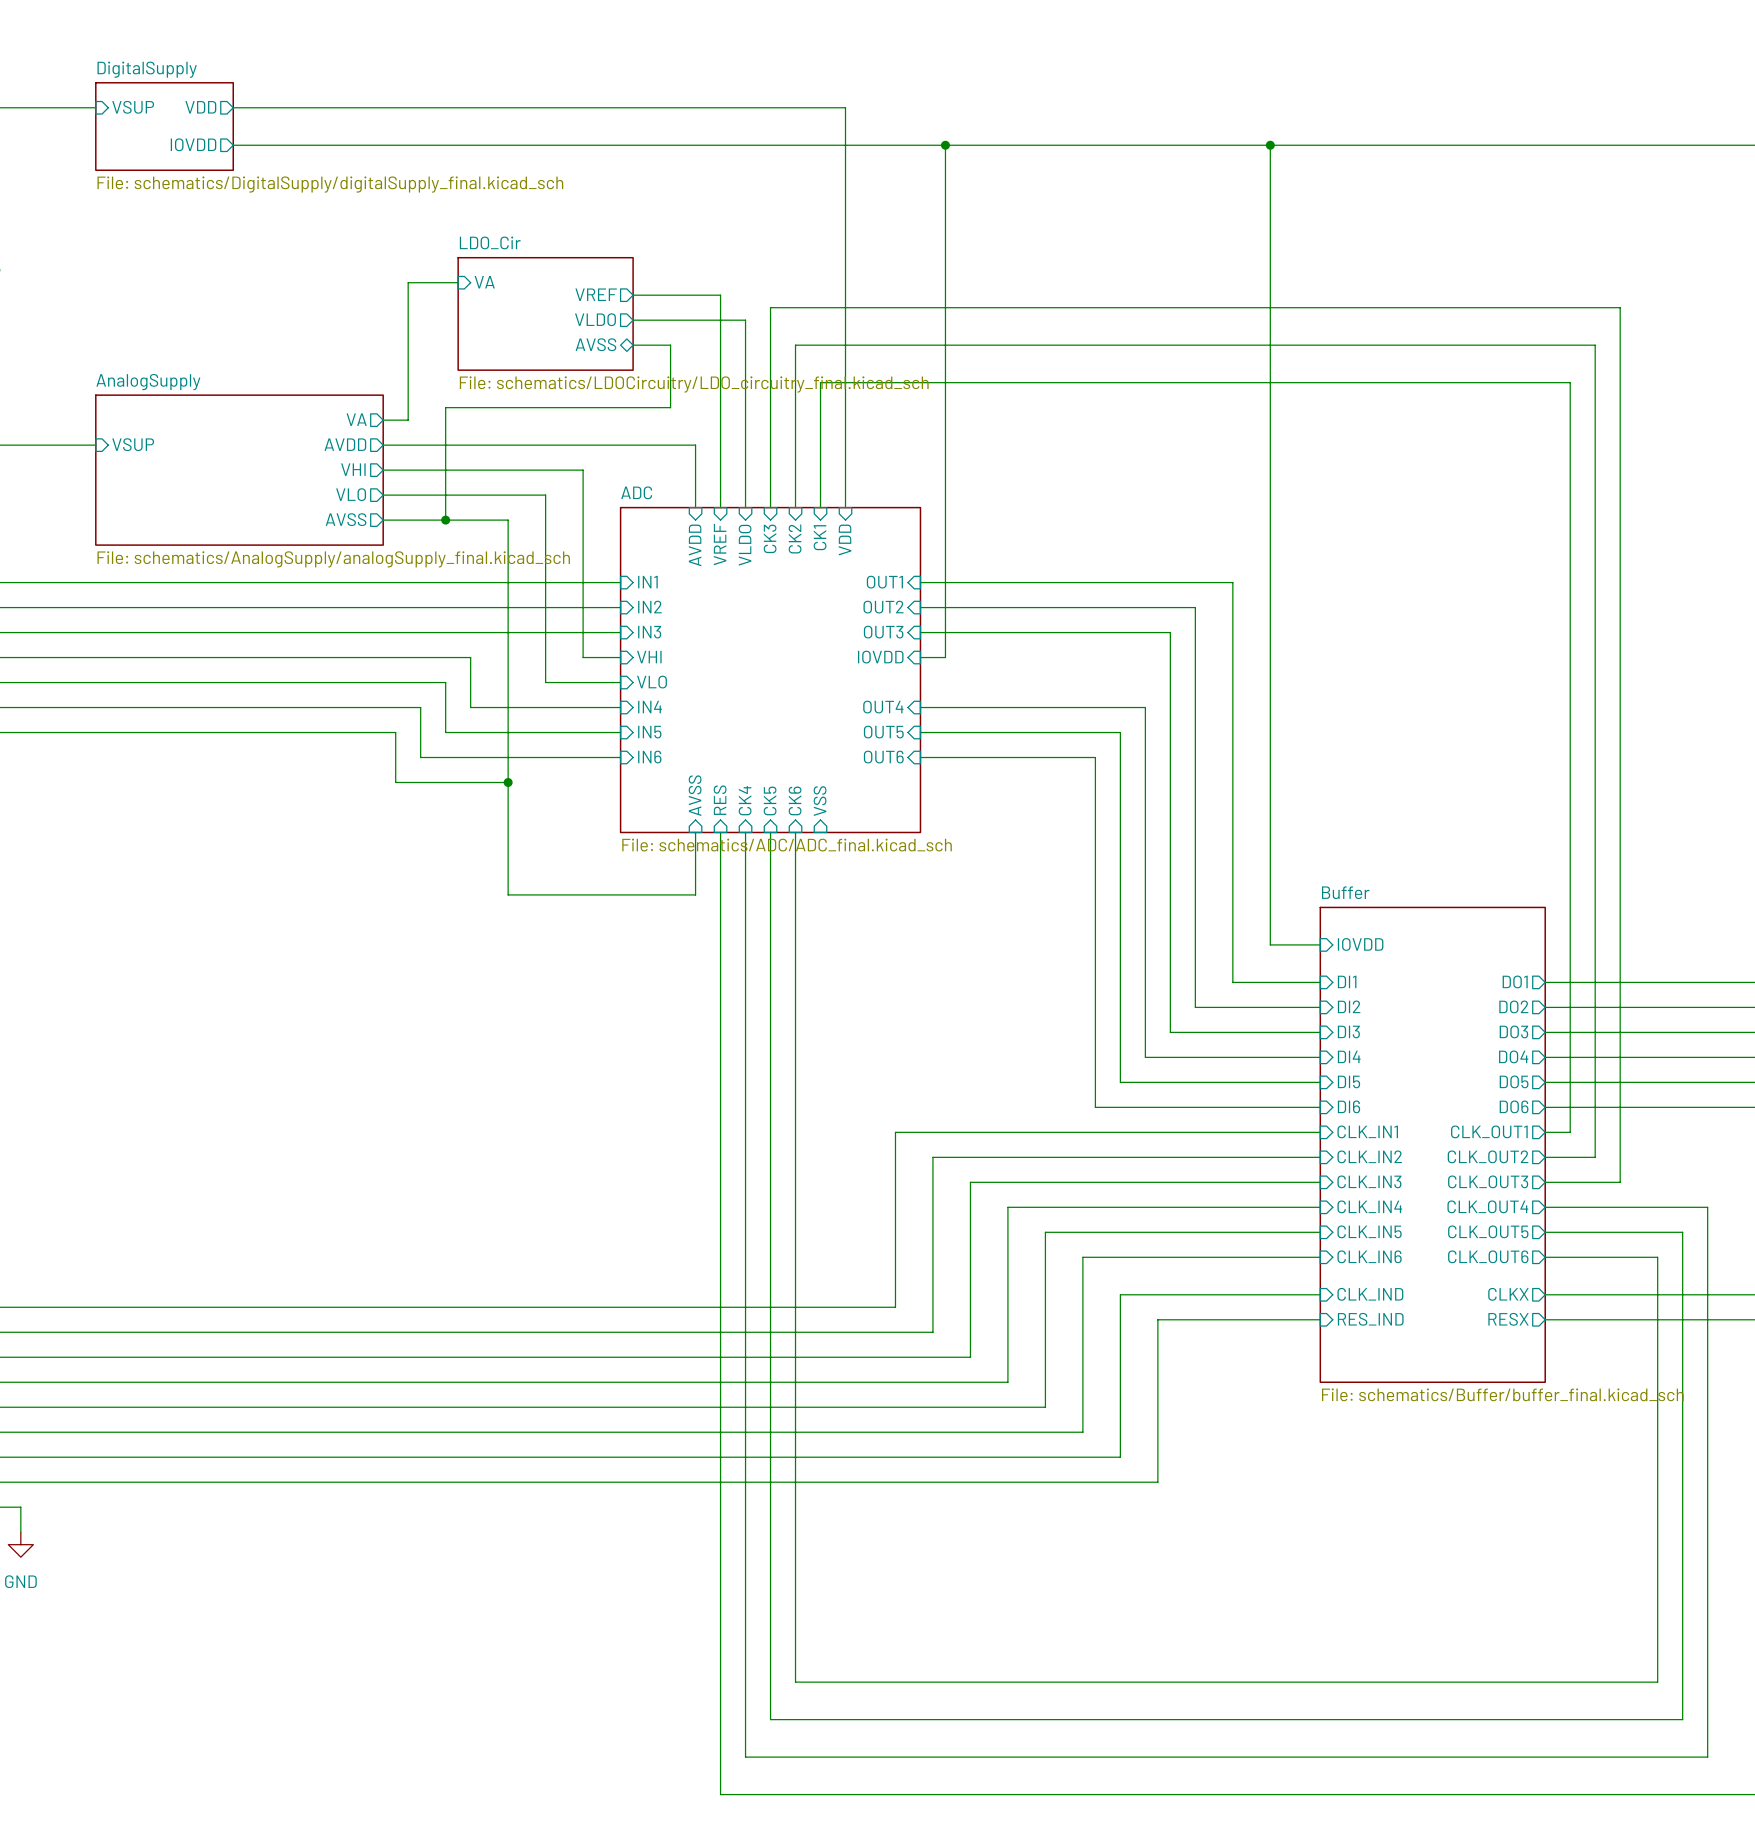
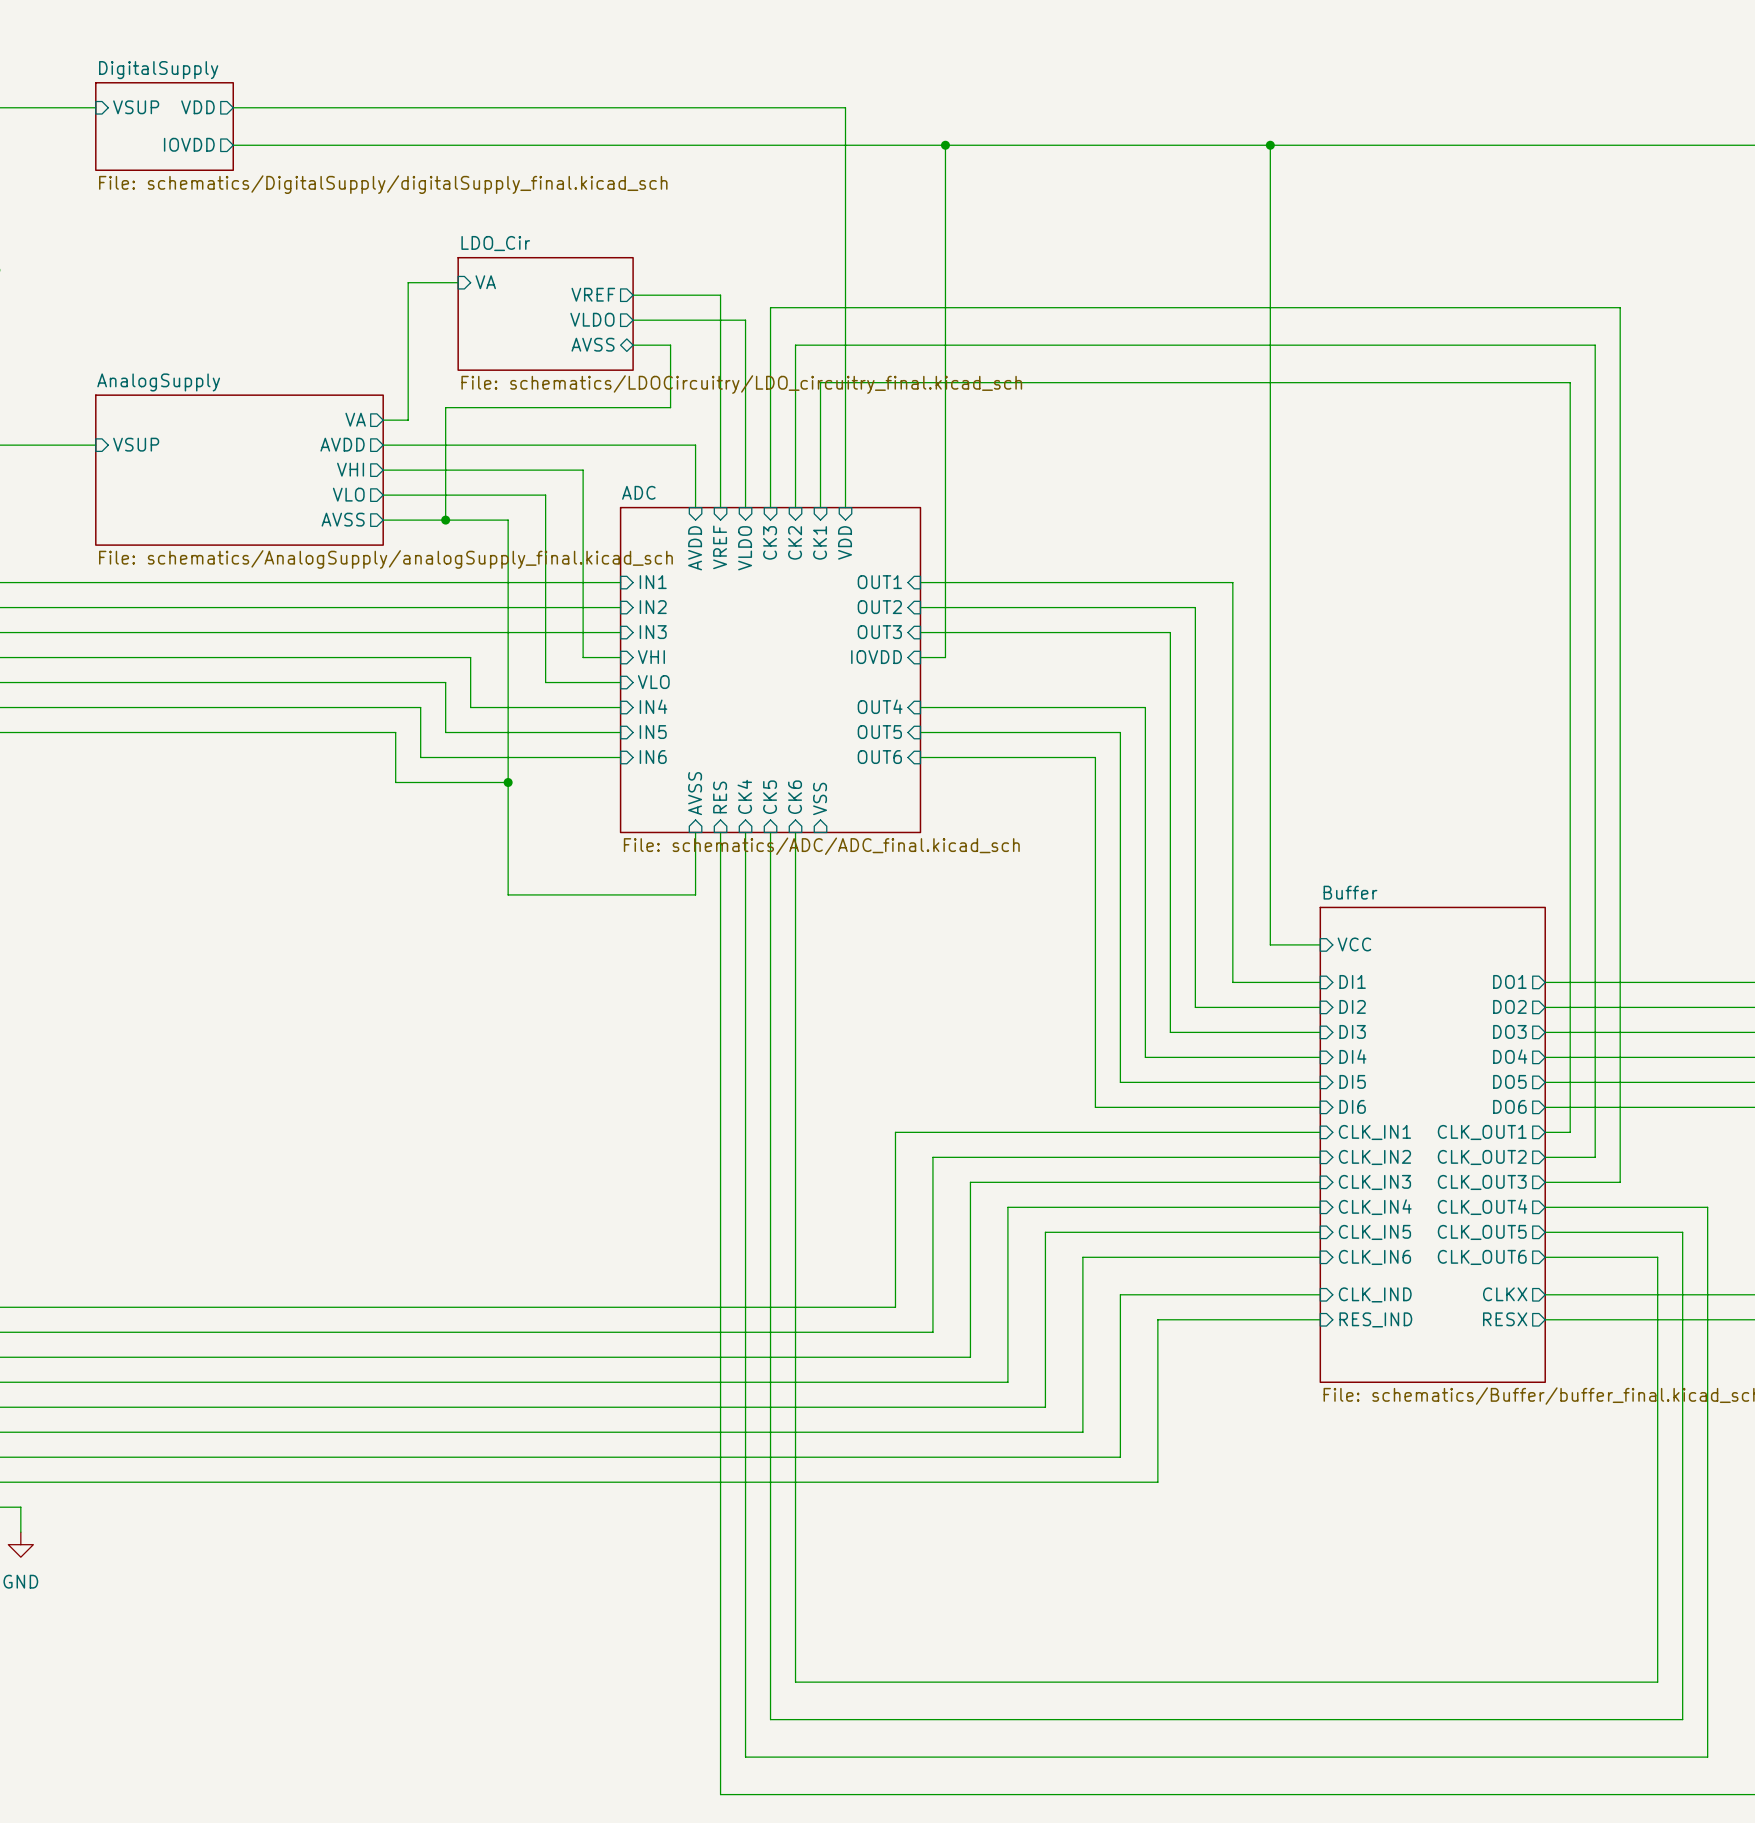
sheet pin: IOVDD (1360, 944) -> VCC (1354, 944)

